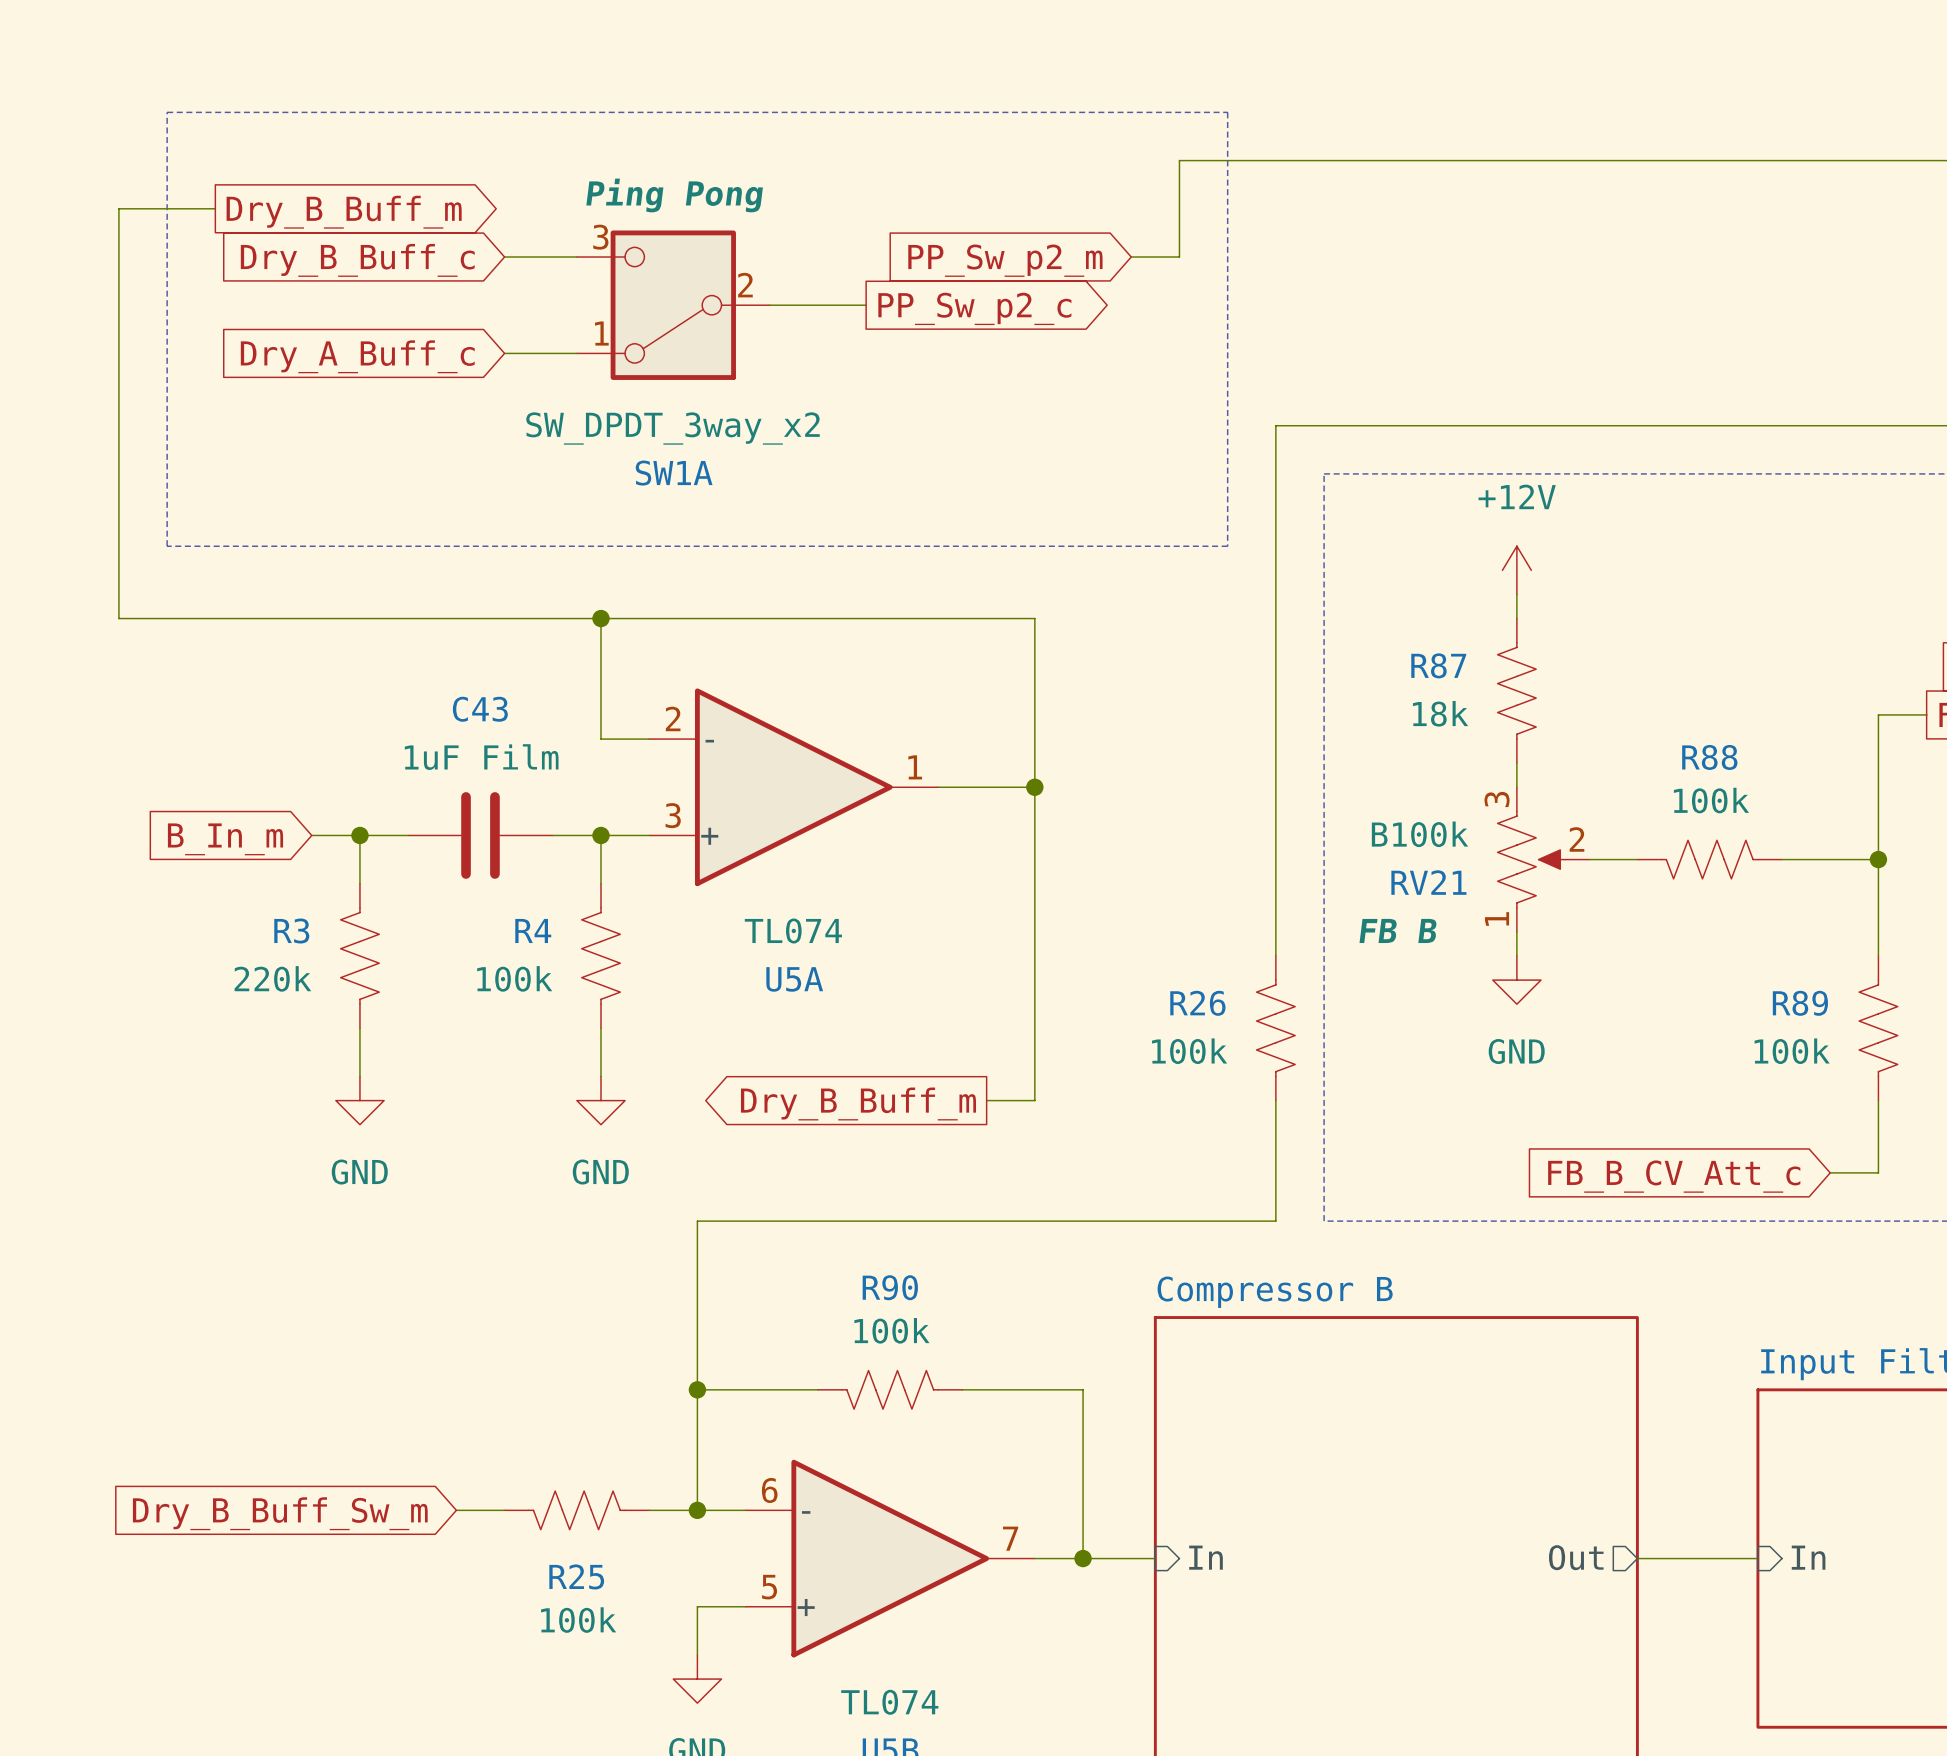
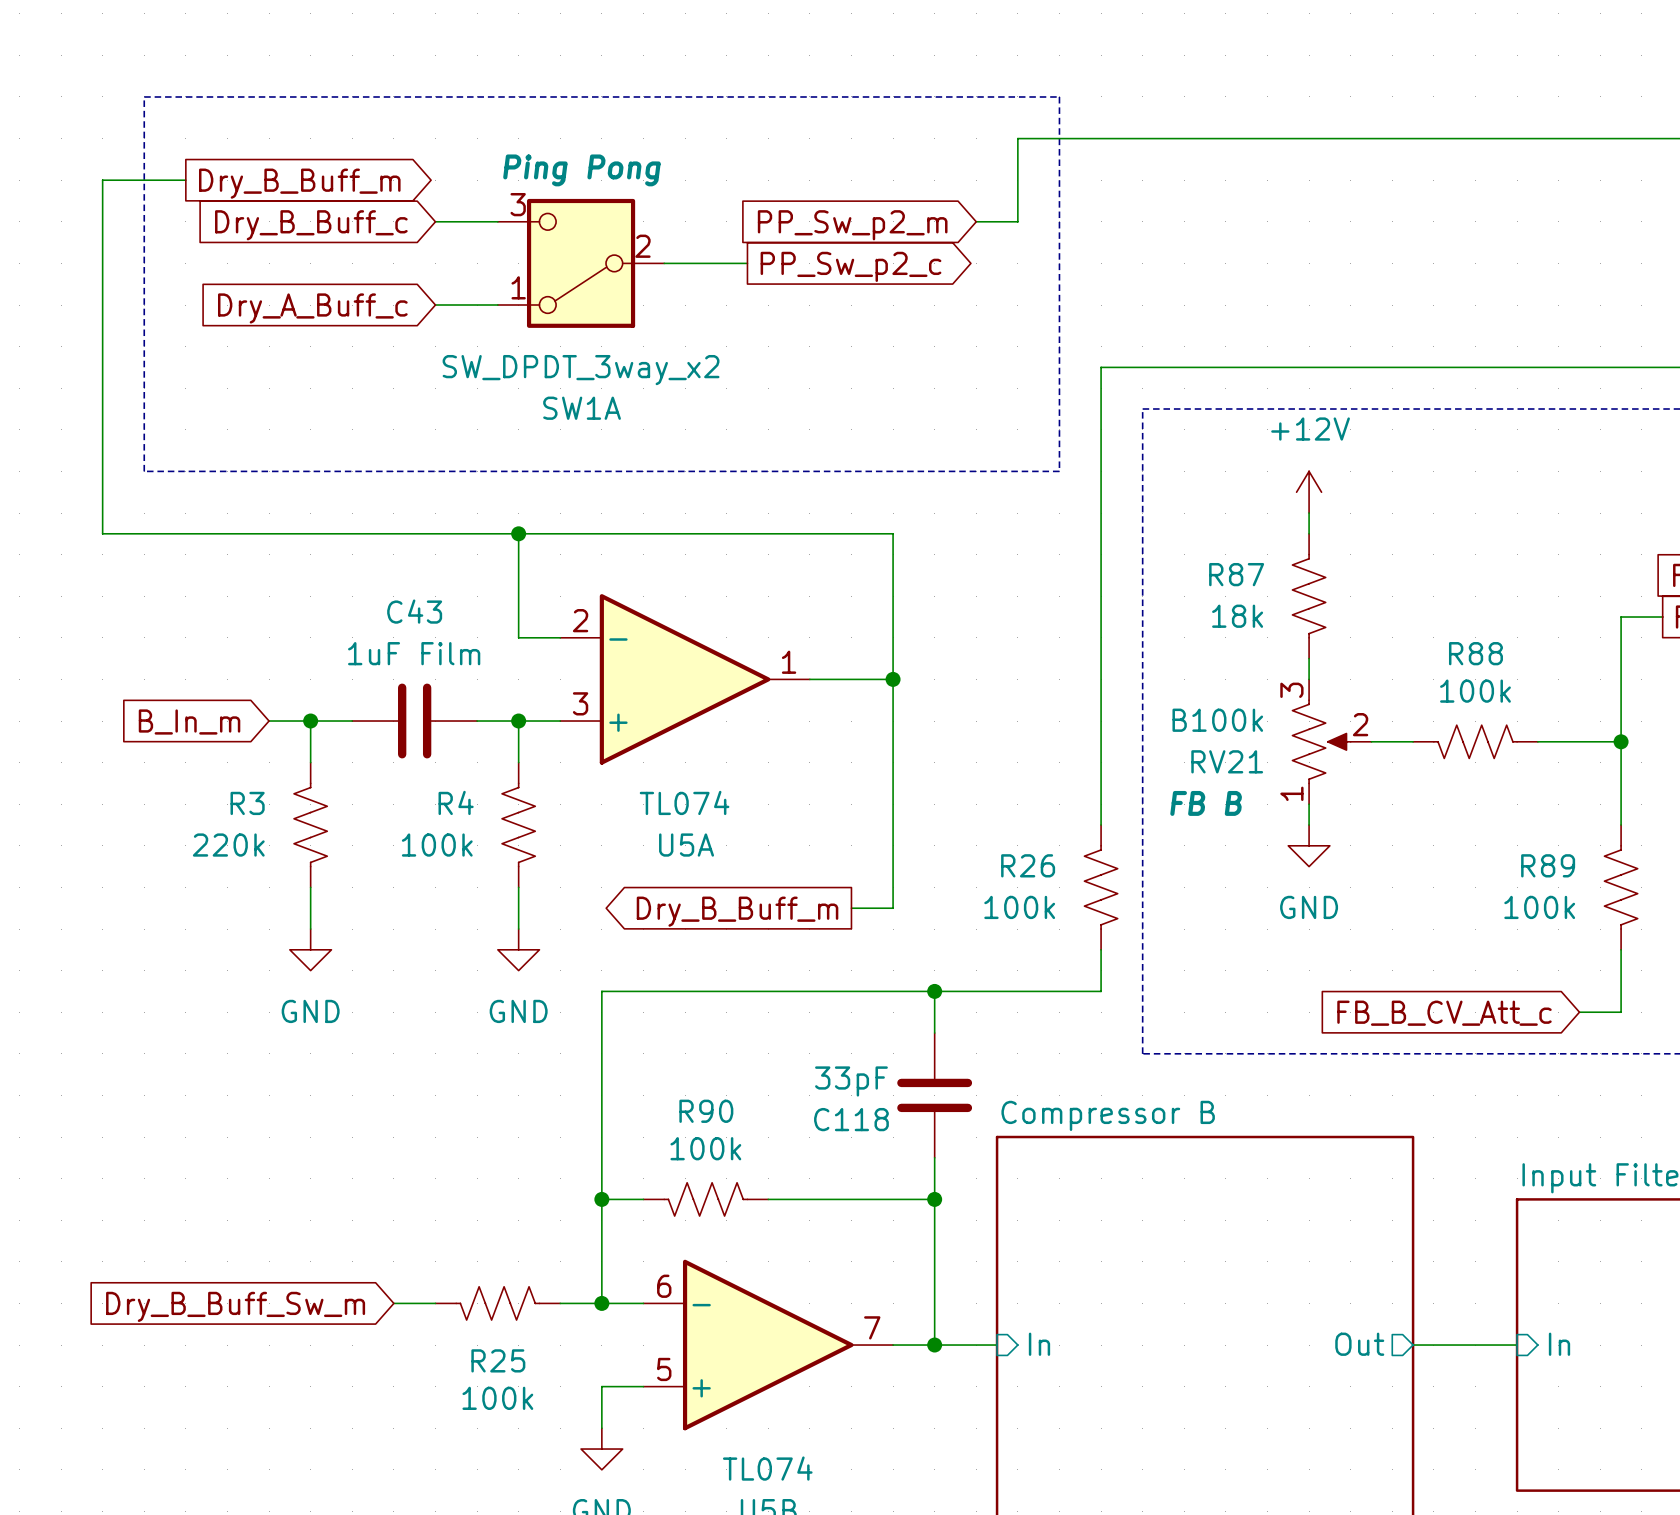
wire: (1034, 1052) (1034, 1100) (986, 1100) -> (893, 908) (851, 908)
global label position: Dry_B_Buff_m (858, 1103) -> Dry_B_Buff_m (737, 911)
wire: none -> (934, 991) (934, 1033)
junction: none -> (934, 991)
wire: (1275, 1148) (1275, 1221) (697, 1221) -> (1101, 991) (601, 991) (601, 1053)
C118: none -> 33pF (934, 1095)
wire: none -> (934, 1157) (934, 1199)
wire: (745, 1389) (817, 1389) -> (768, 1199) (830, 1199)
R90 position: (890, 1389) -> (705, 1199)
junction: none -> (934, 1199)

